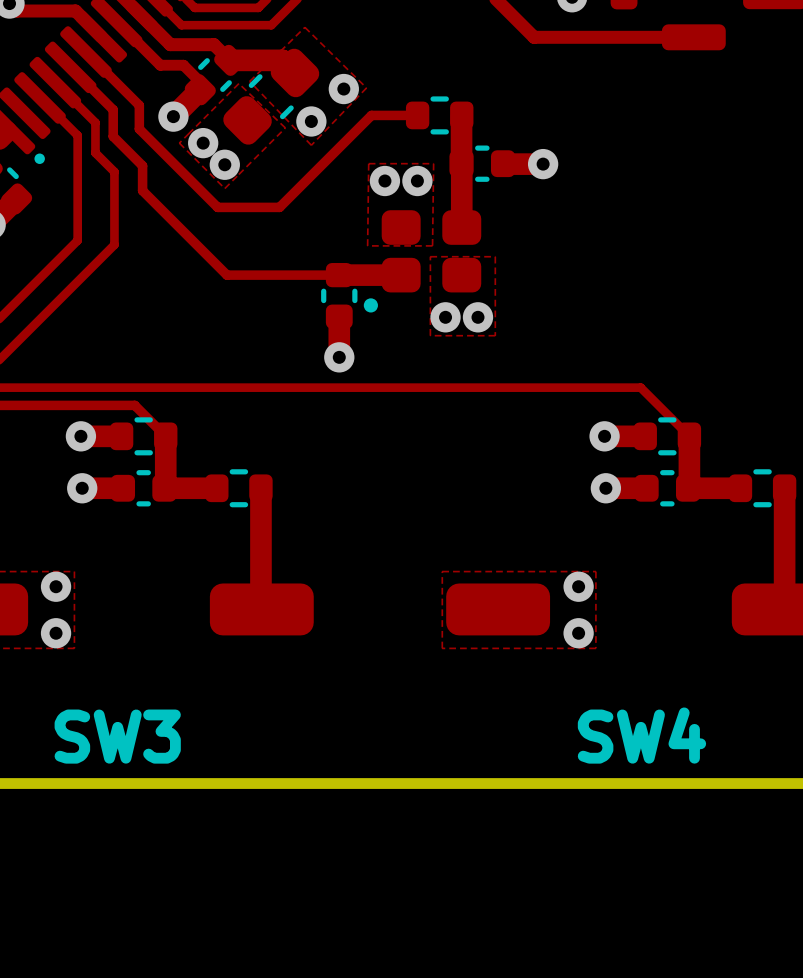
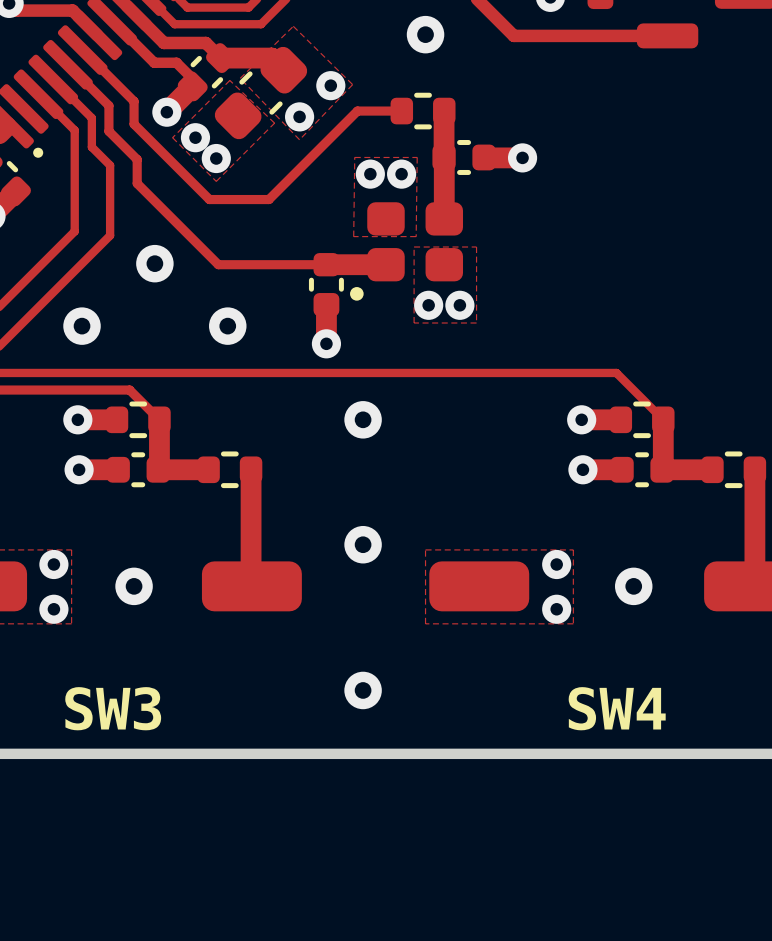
via: none -> (425, 34)
via: none -> (154, 263)
via: none -> (82, 326)
via: none -> (227, 326)
via: none -> (363, 419)
via: none -> (363, 544)
via: none -> (134, 586)
via: none -> (633, 586)
via: none -> (363, 690)

